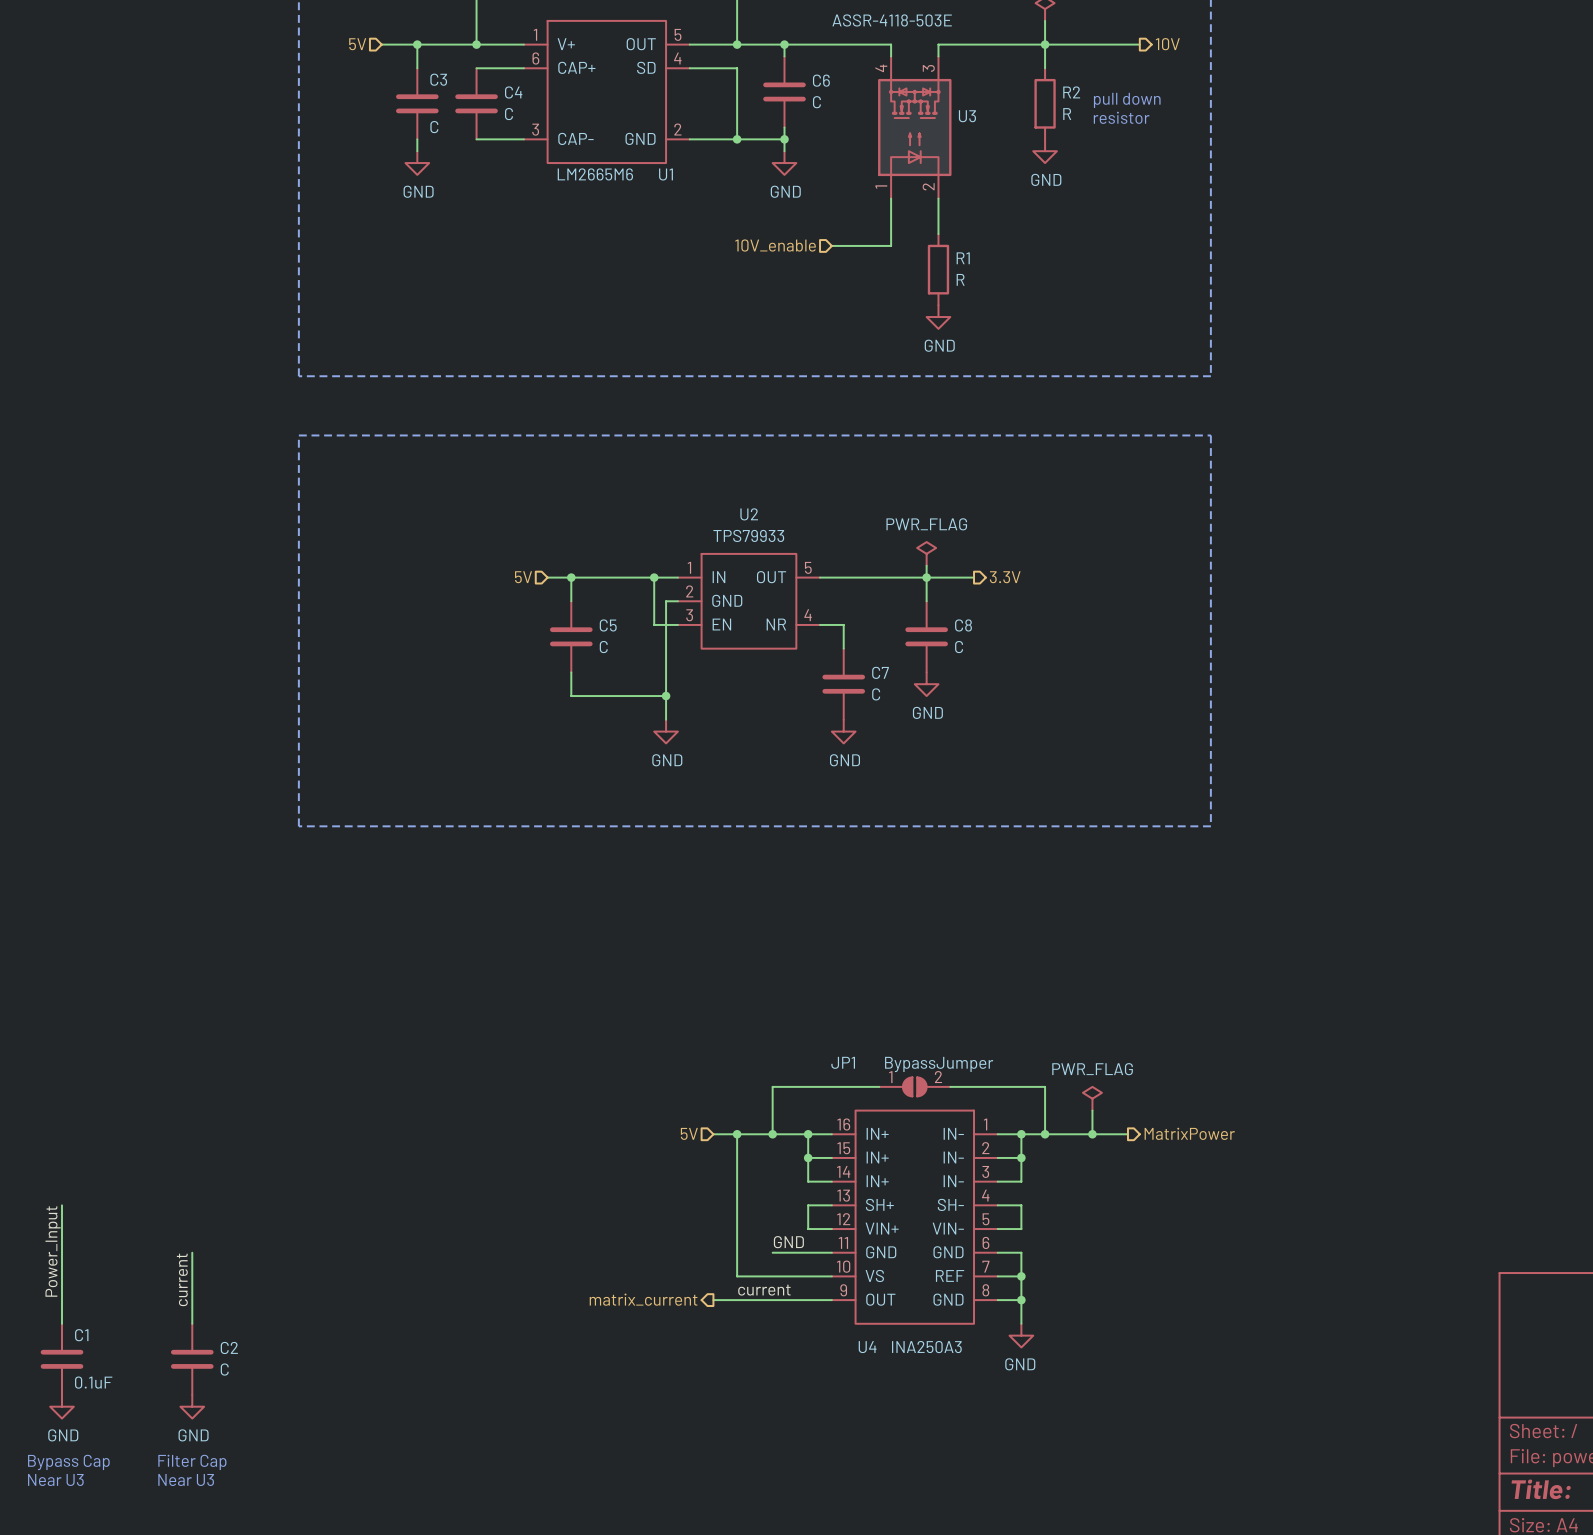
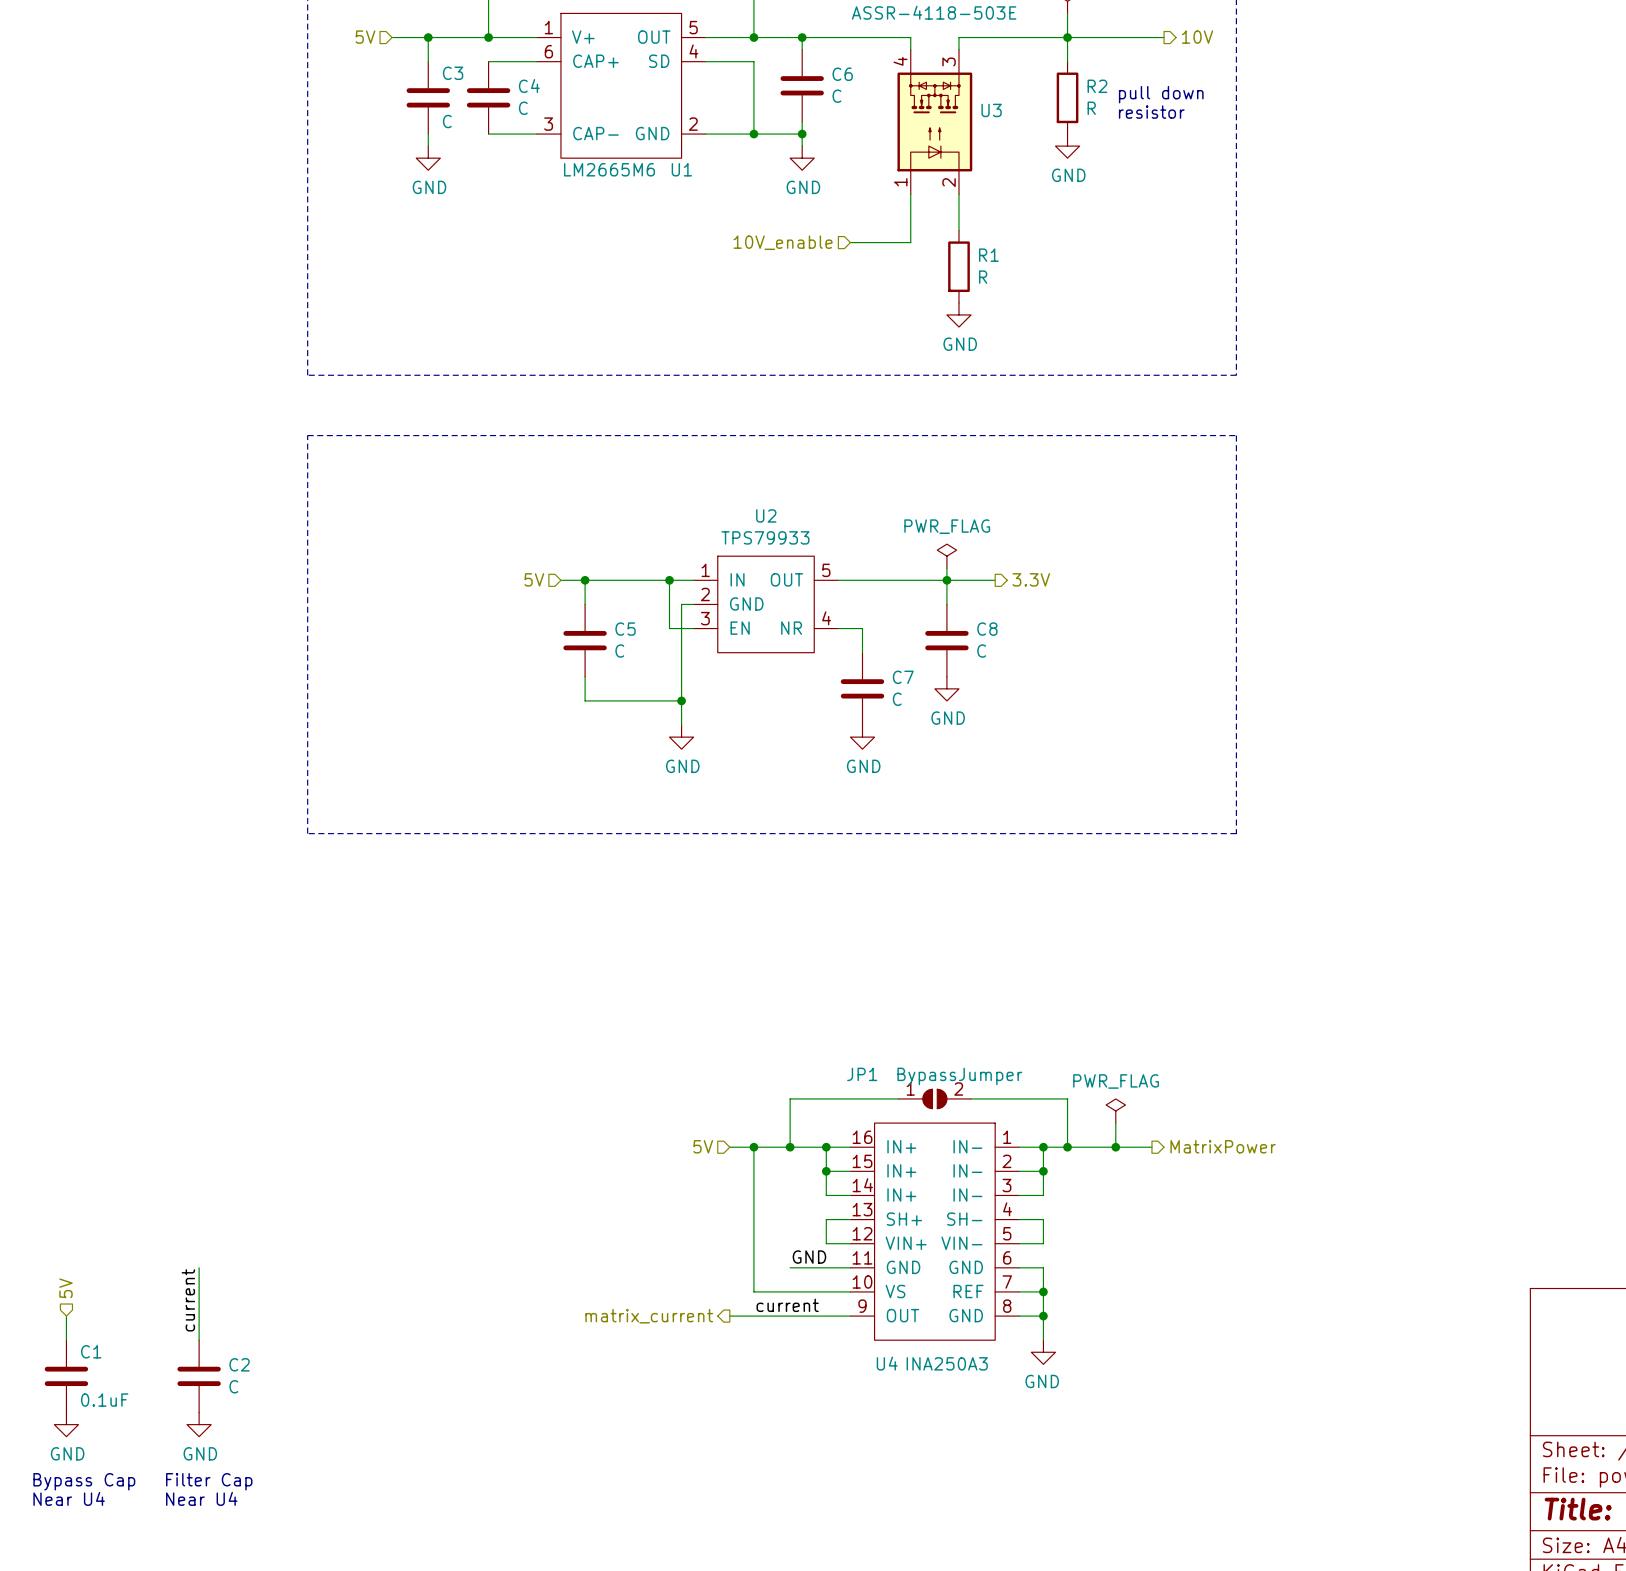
wire: (61, 1205) (61, 1300) -> none
label: Power_Input (53, 1251) -> none
hierarchical label: none -> 5V (65, 1288)
text: Near U3 (55, 1479) -> Near U4 (69, 1498)
text: Near U3 (186, 1479) -> Near U4 (201, 1498)

